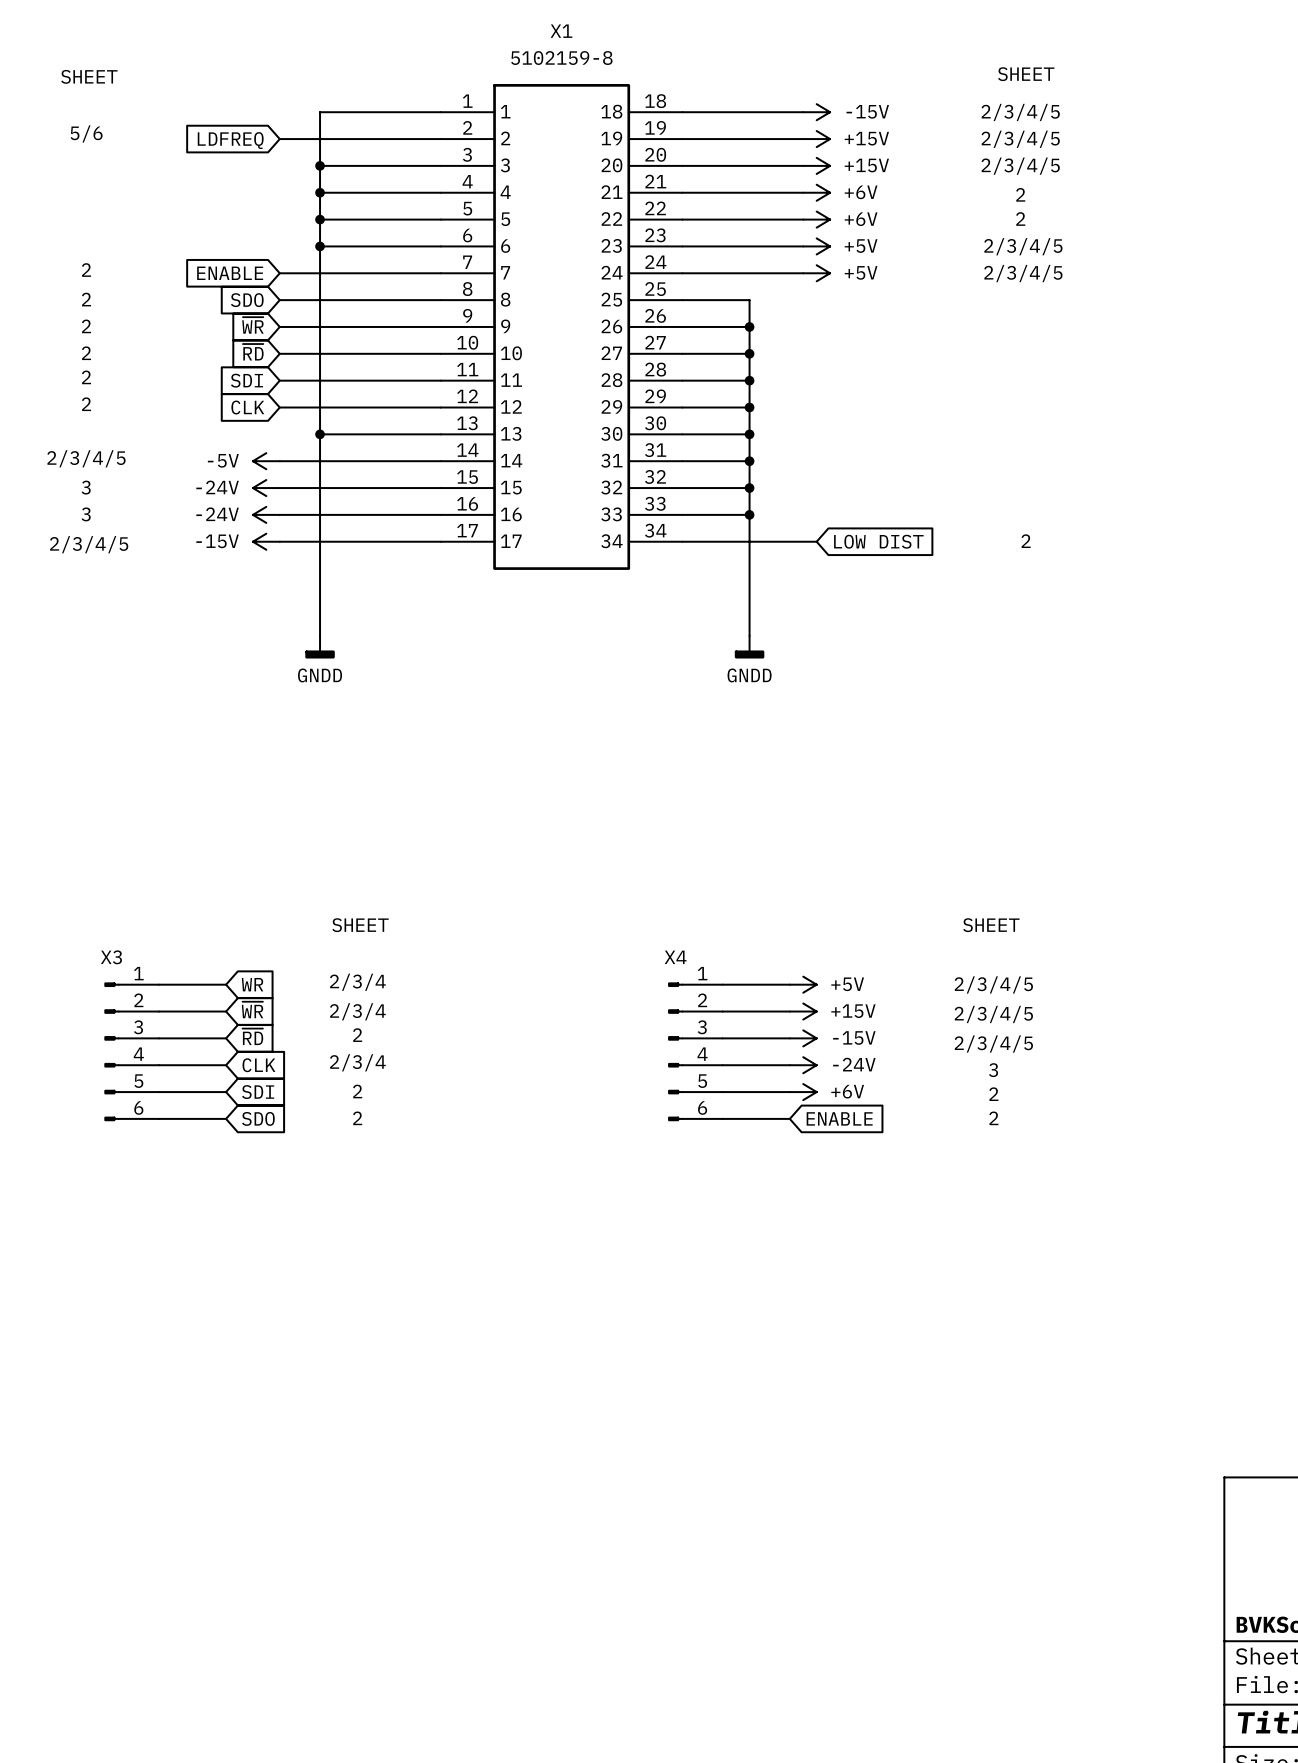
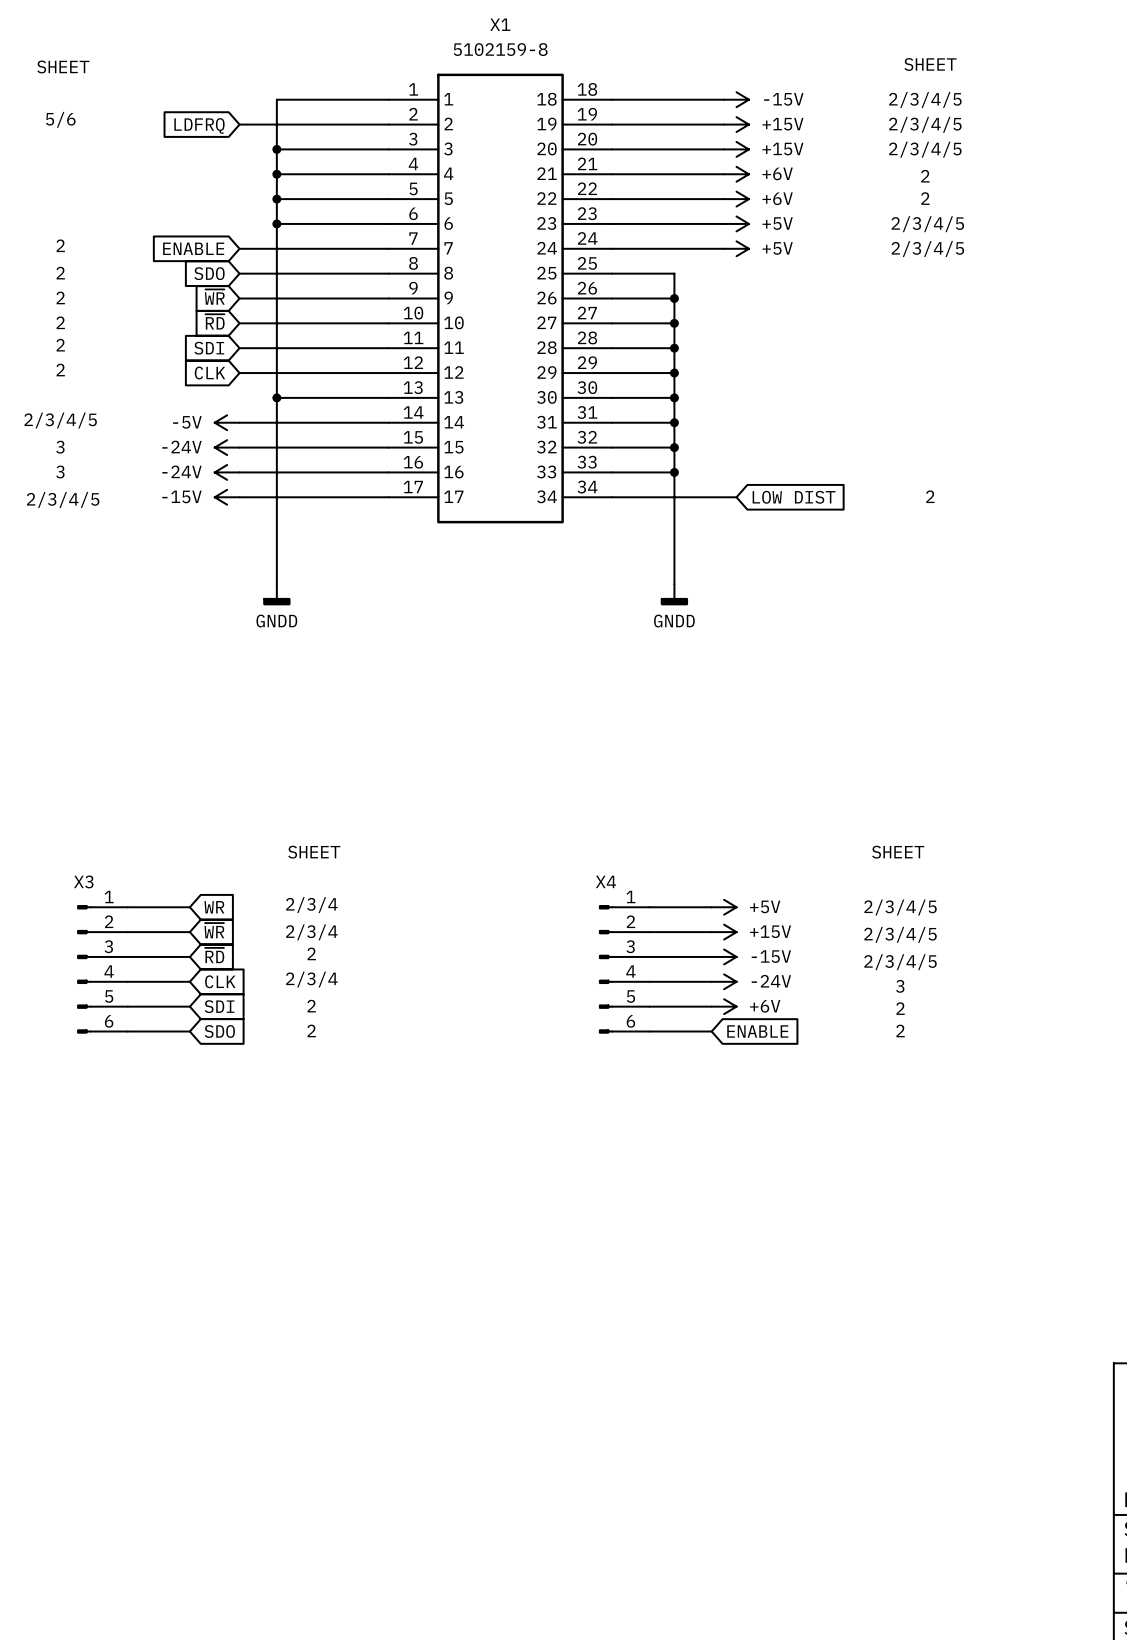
global label: LDFREQ (230, 140) -> LDFRQ (199, 125)

